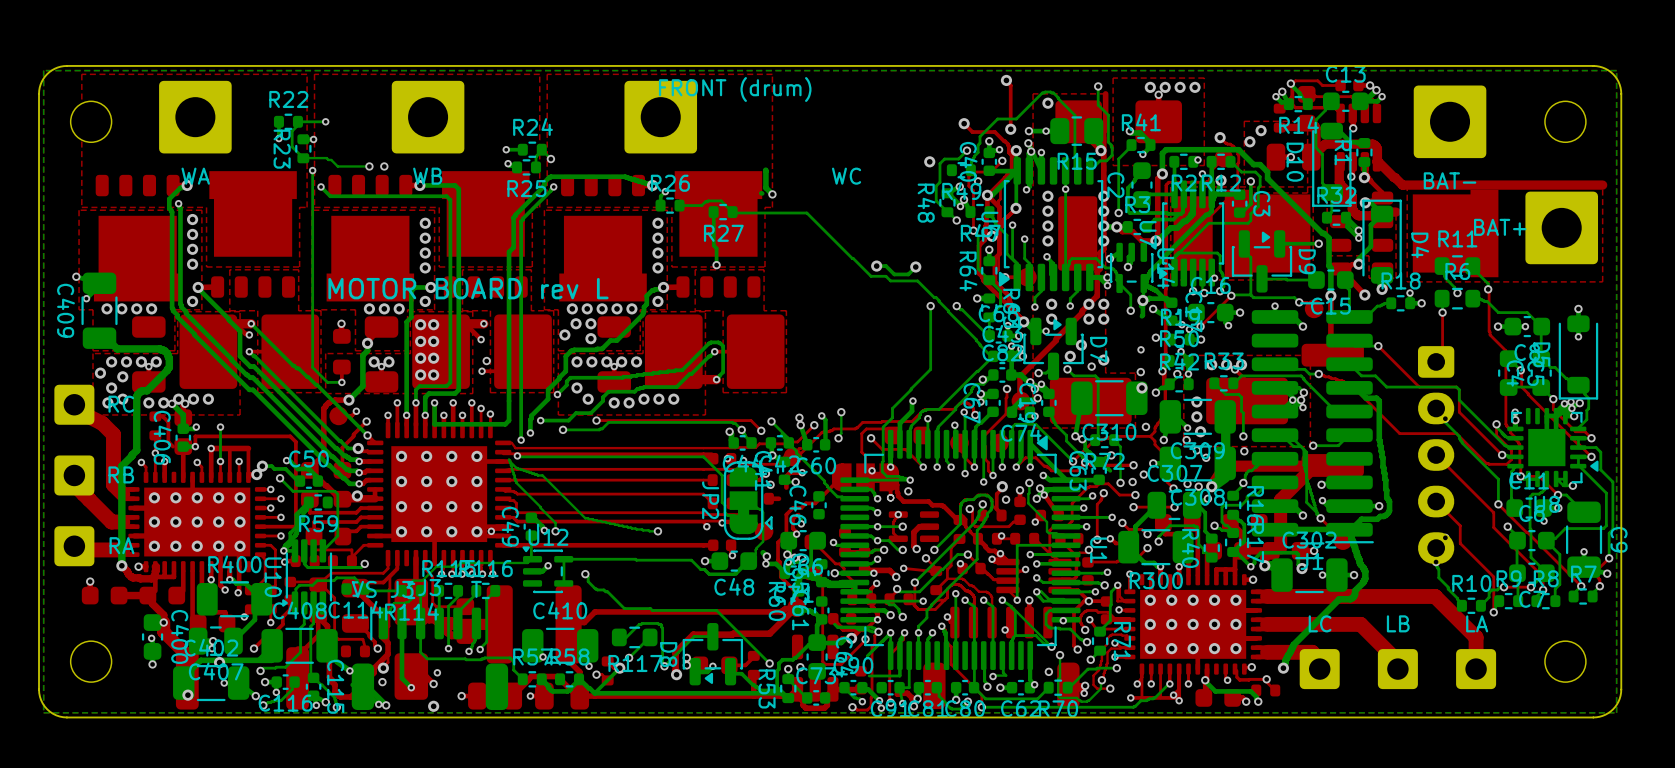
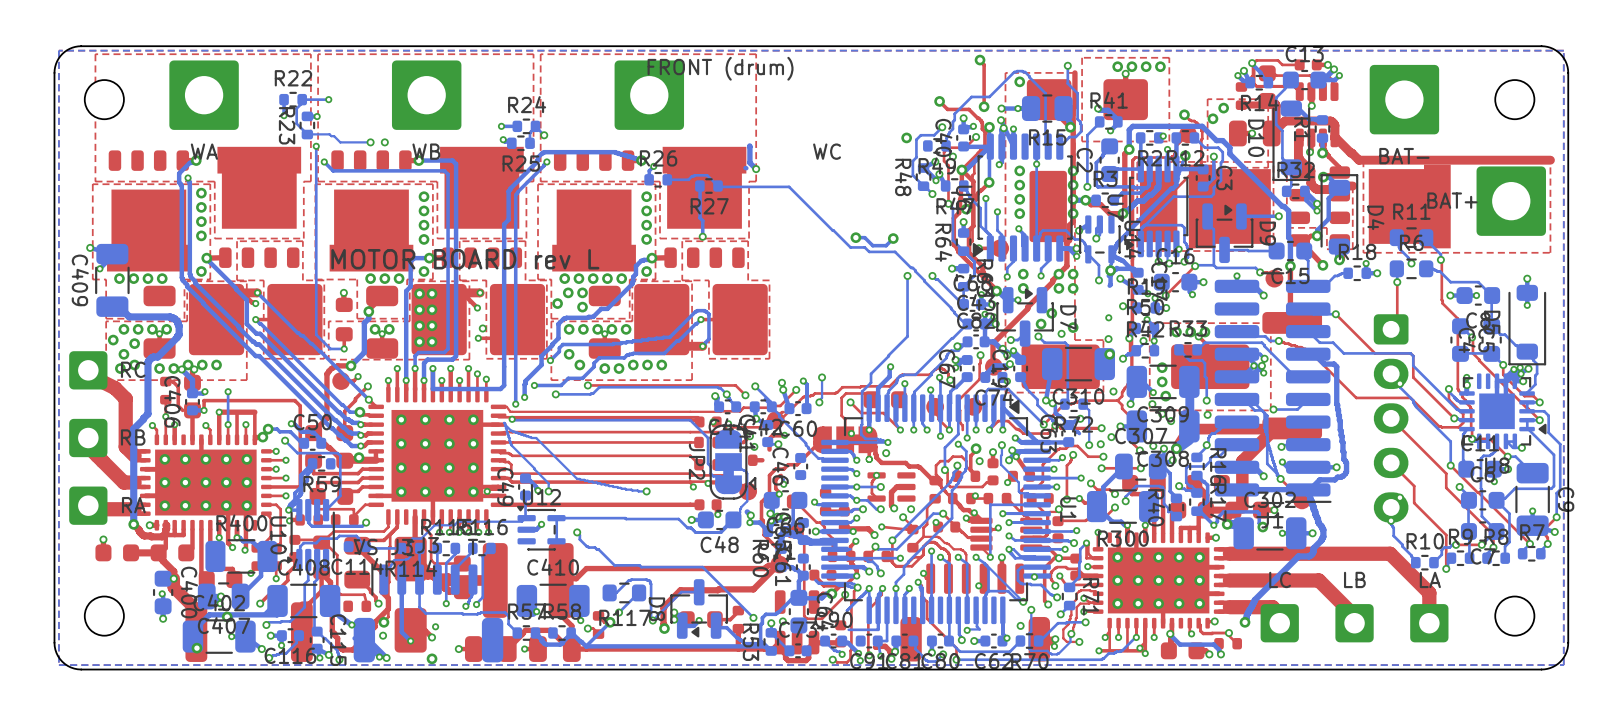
top track: (988, 467) (988, 470) (993, 475) -> none
bottom track: (983, 471) (983, 482) -> (958, 434) (944, 447) (944, 470)
bottom track: (992, 501) (985, 495) (964, 500) (960, 506) (960, 523) (934, 549) -> (966, 462) (966, 451) (960, 445)

